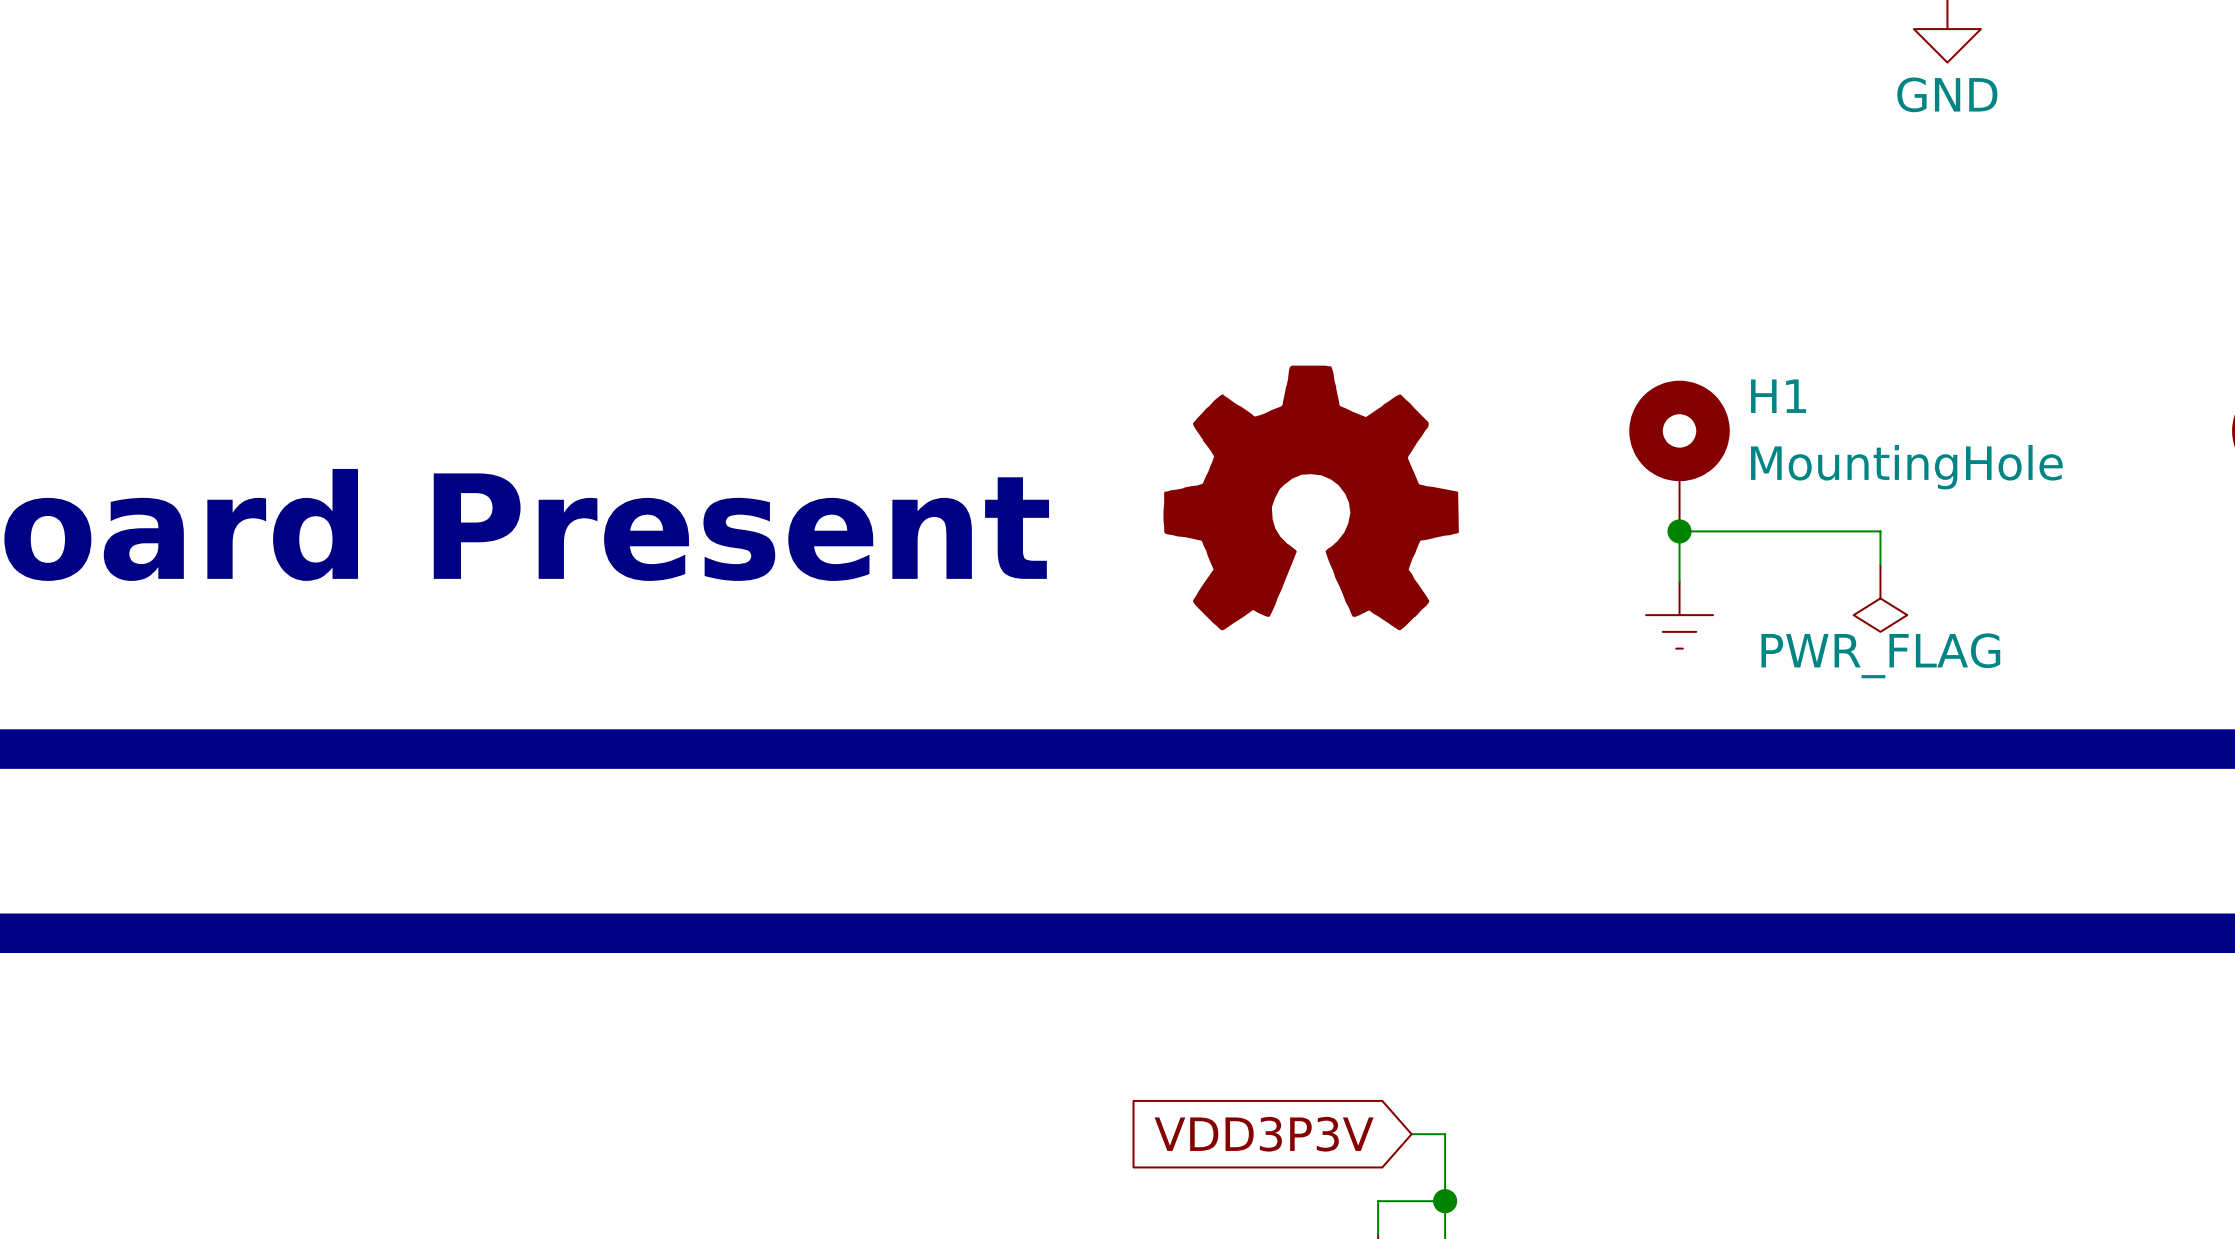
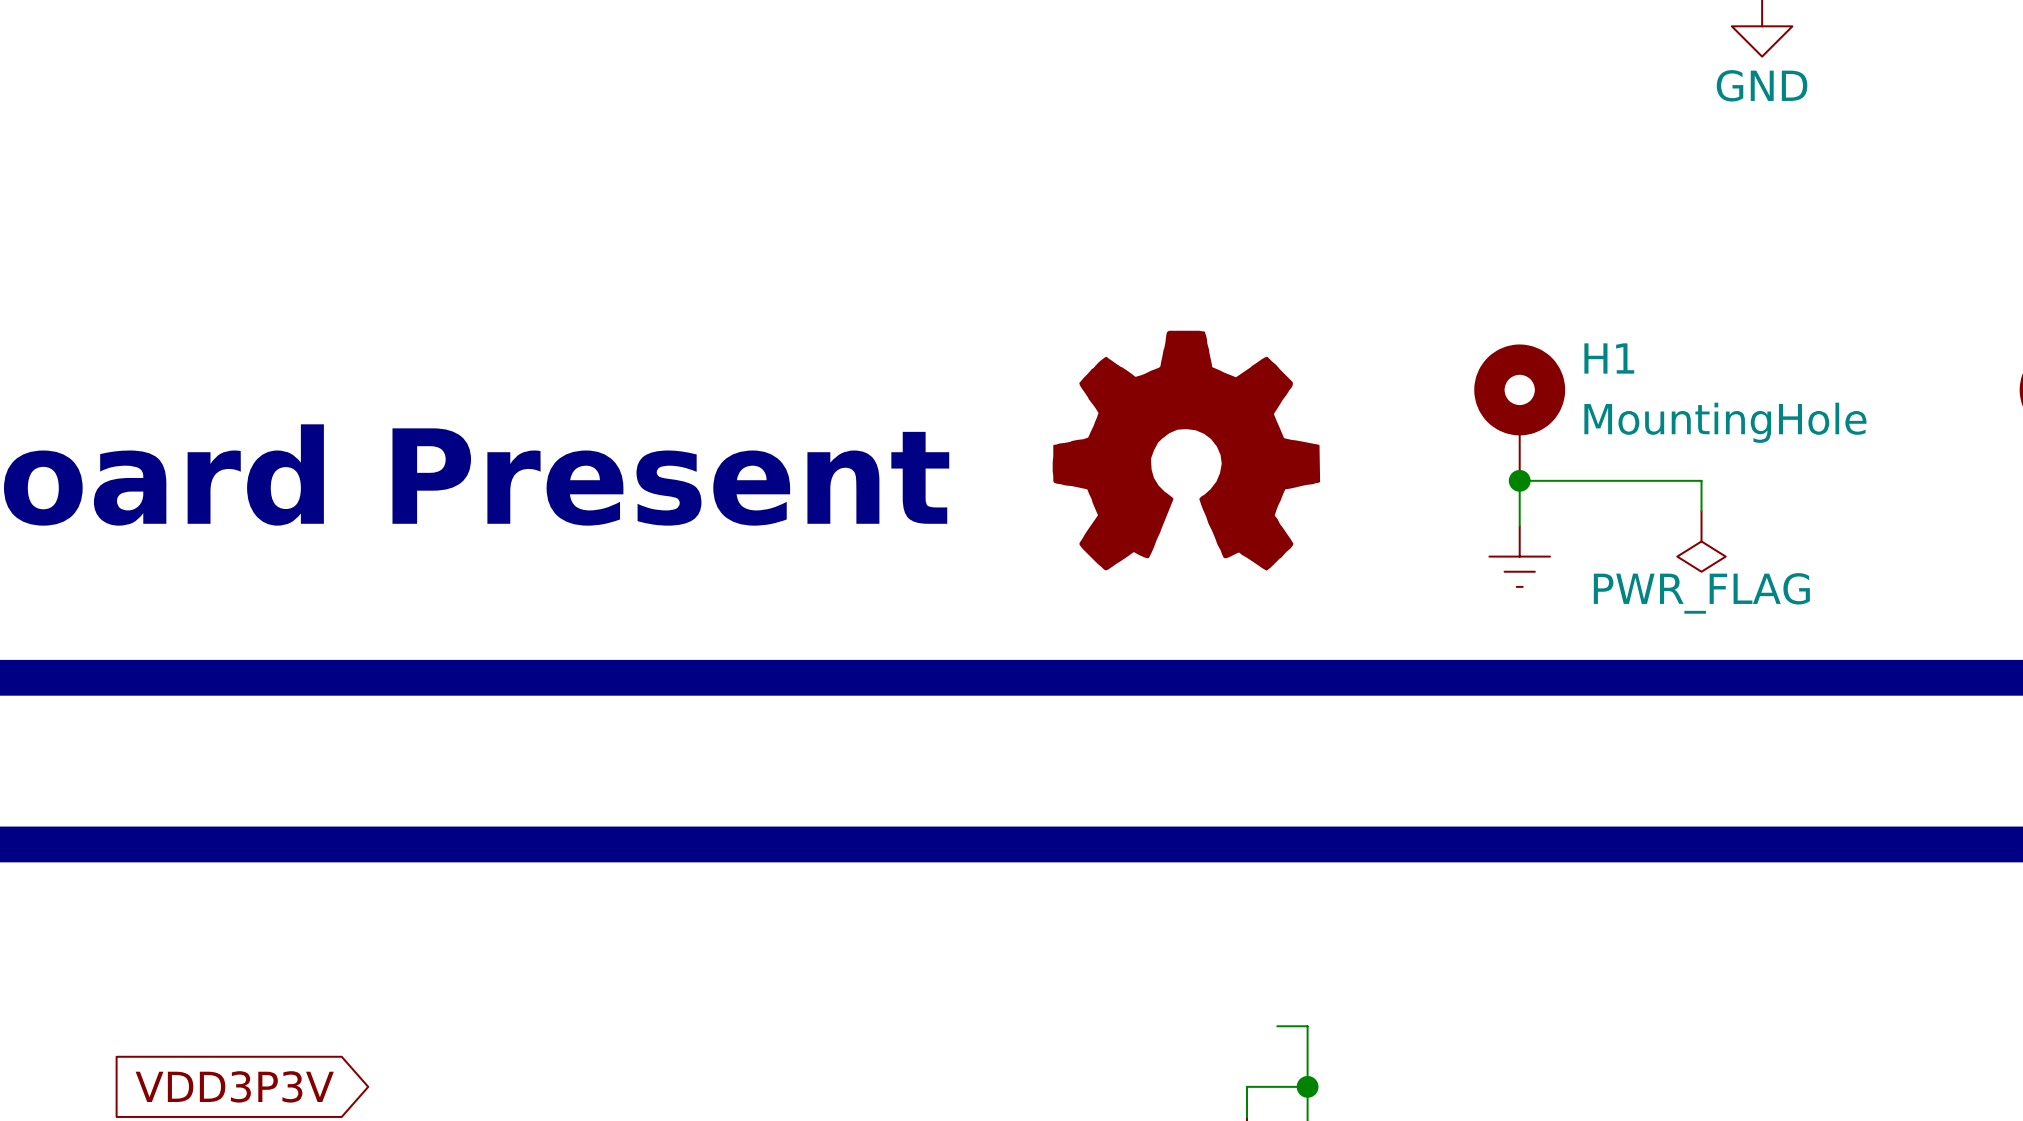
global label: VDD3P3V (1264, 1134) -> none
global label: none -> VDD3P3V (234, 1086)

